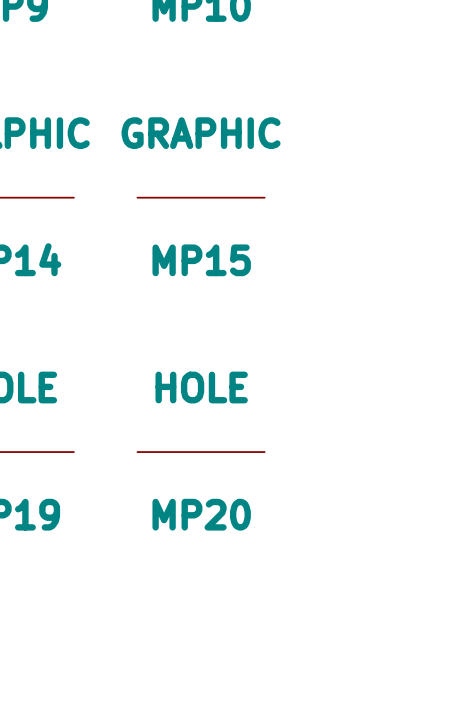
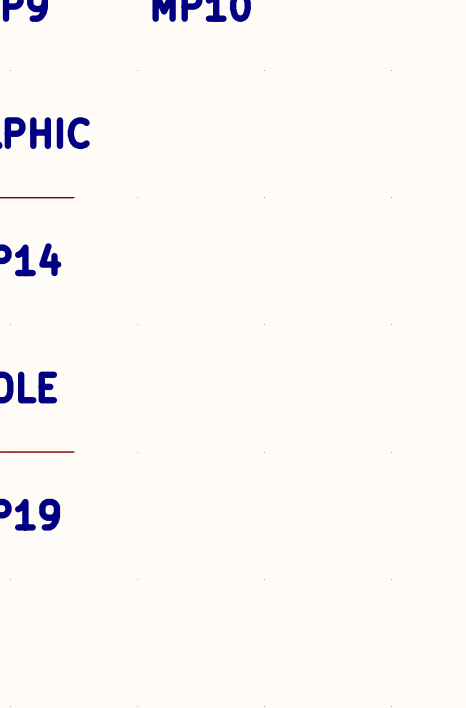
MP15: GRAPHIC (201, 197) -> none
MP20: HOLE (201, 452) -> none

